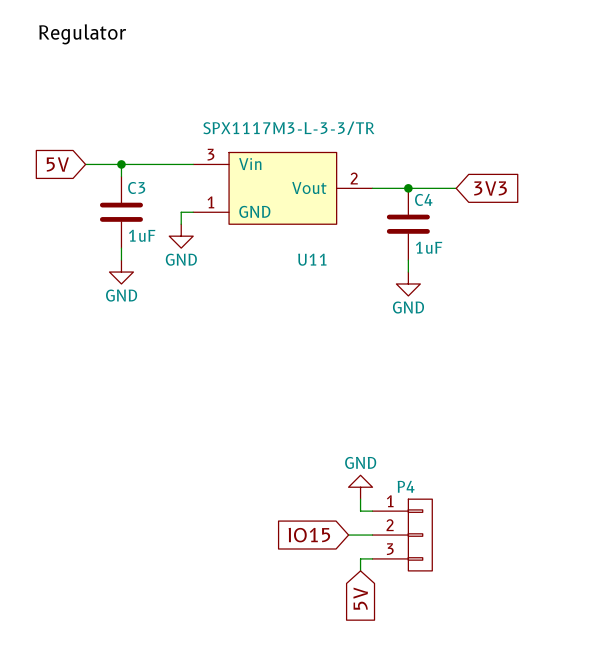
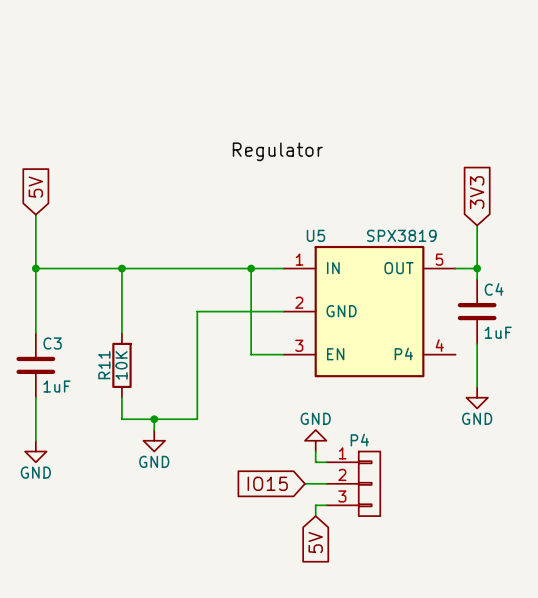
label: Regulator (82, 34) -> none
global label rotation: 0° (57, 164) -> 90° clockwise (35, 187)
wire: (85, 164) (193, 164) -> none
wire: (121, 164) (121, 176) -> none
junction: (121, 164) -> none
label: none -> Regulator (277, 151)
U11: SPX1117M3-L-3-3/TR (282, 188) -> none
wire: (372, 188) (456, 188) -> none
junction: (408, 188) -> none
global label rotation: 0° (490, 188) -> 90° counterclockwise (477, 192)
C3 position: (121, 212) -> (35, 365)
wire: (193, 212) (181, 212) (181, 224) -> none
C4 position: (408, 224) -> (477, 311)
wire: none -> (35, 214) (35, 333)
power symbol: GND (181, 236) -> none
wire: (121, 248) (121, 260) -> (154, 419) (154, 429)
wire: none -> (477, 225) (477, 279)
wire: (408, 260) (408, 272) -> none
power symbol: GND (121, 272) -> none
power symbol: GND (408, 283) -> none
wire: none -> (35, 268) (283, 268)
junction: none -> (35, 268)
wire: none -> (121, 268) (121, 333)
junction: none -> (121, 268)
wire: none -> (251, 268) (251, 354) (283, 354)
junction: none -> (251, 268)
wire: none -> (455, 268) (477, 268)
junction: none -> (477, 268)
wire: none -> (283, 311) (197, 311) (197, 419) (121, 419) (121, 397)
U5: none -> SPX3819 (369, 311)
wire: none -> (477, 343) (477, 386)
R11: none -> 10K (121, 365)
wire: none -> (35, 397) (35, 440)
power symbol: none -> GND (477, 397)
junction: none -> (154, 419)
power symbol: none -> GND (154, 440)
power symbol: none -> GND (35, 451)

